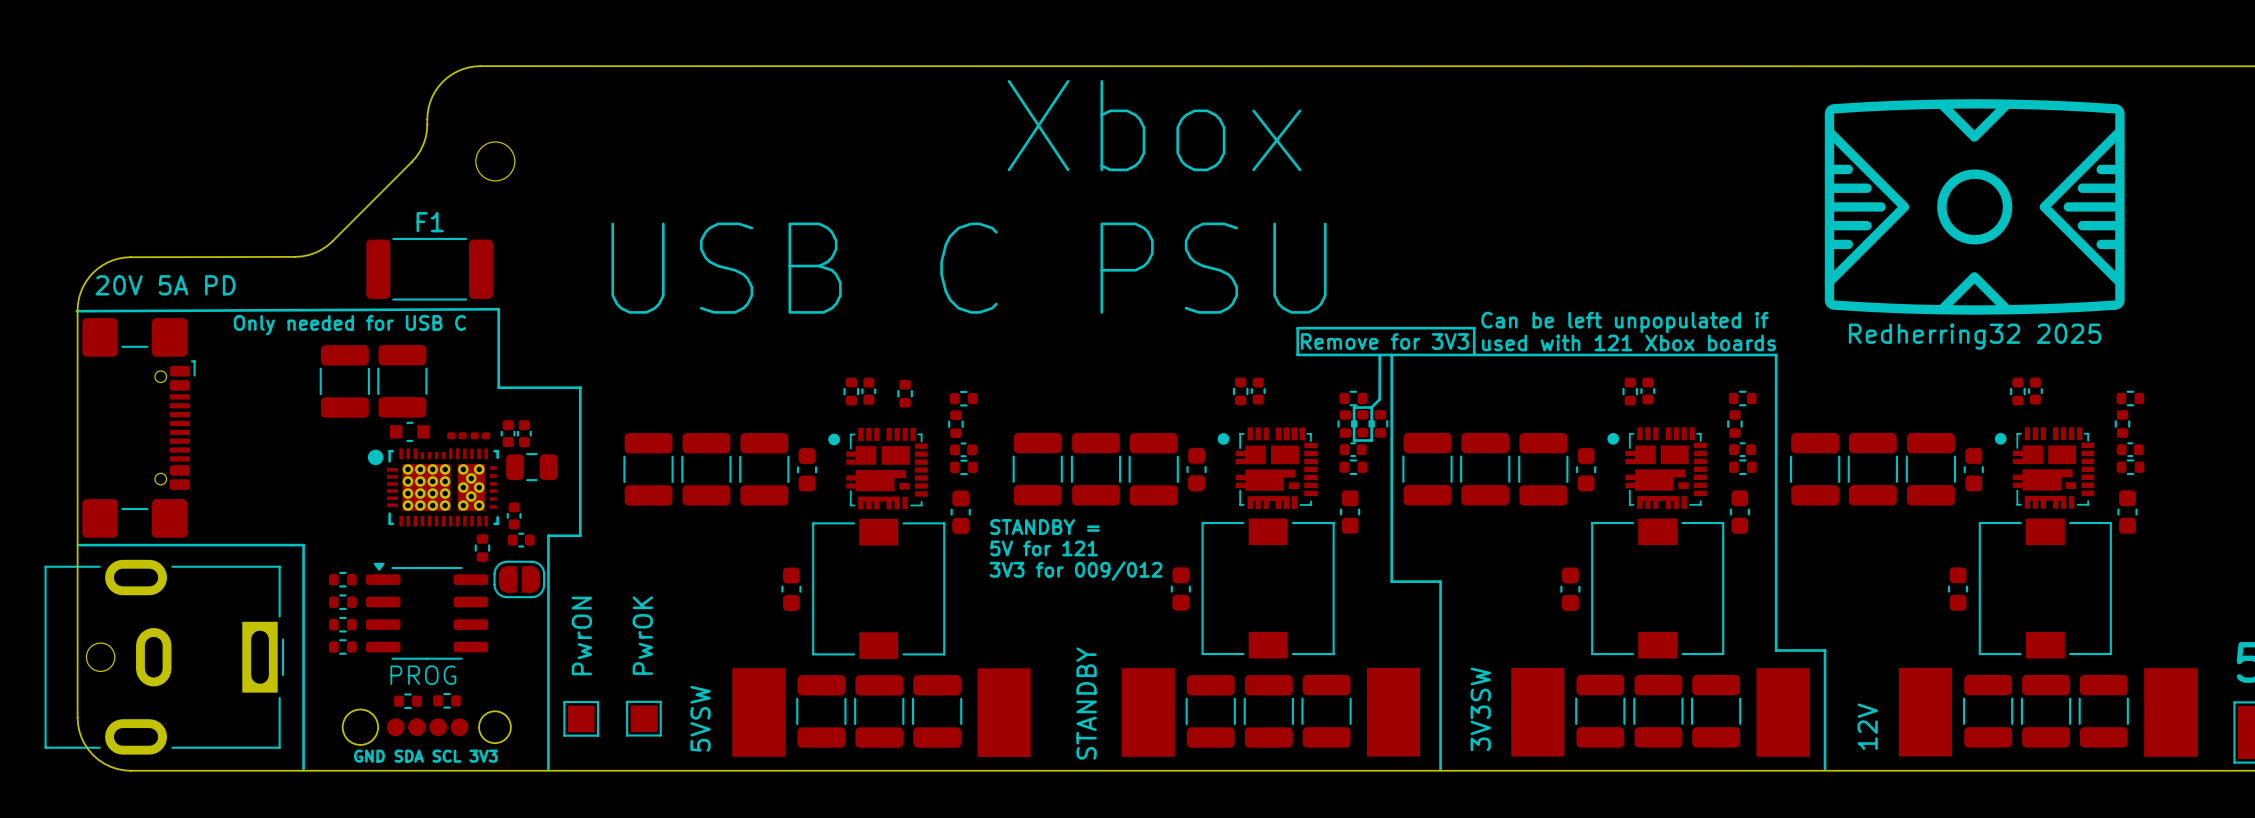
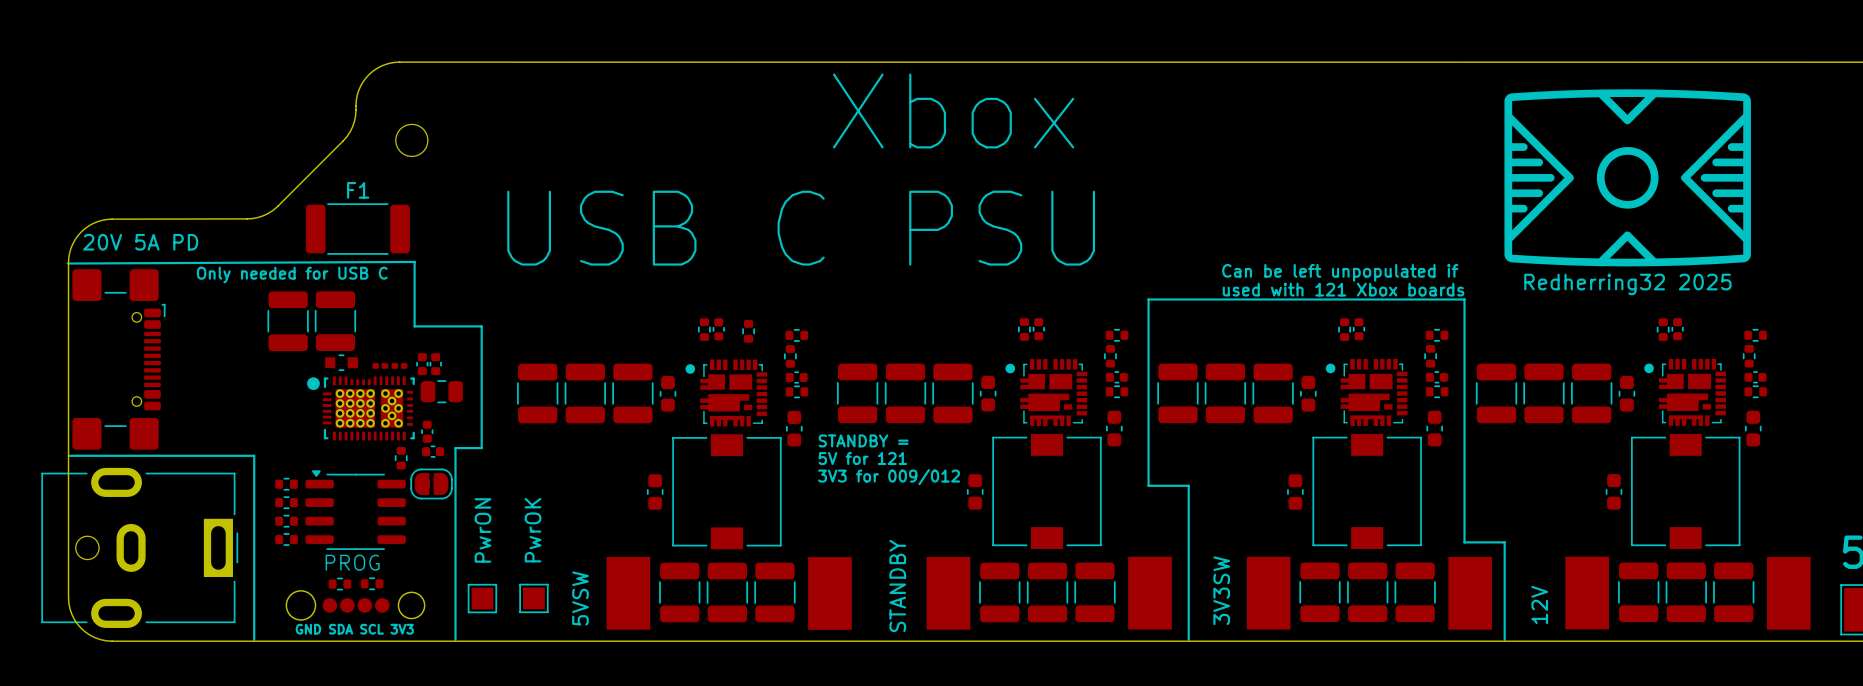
line: (1474, 328) (1474, 354) -> none
line: (1474, 328) (1297, 328) (1297, 354) (1391, 354) -> none
text: Remove for 3V3 (1384, 341) -> none
line: (1379, 354) (1379, 399) (1371, 407) -> none
line: (1371, 407) (1354, 407) (1354, 440) (1371, 440) (1371, 407) -> none
part: (1362, 423) -> none
part: (1380, 423) -> none

